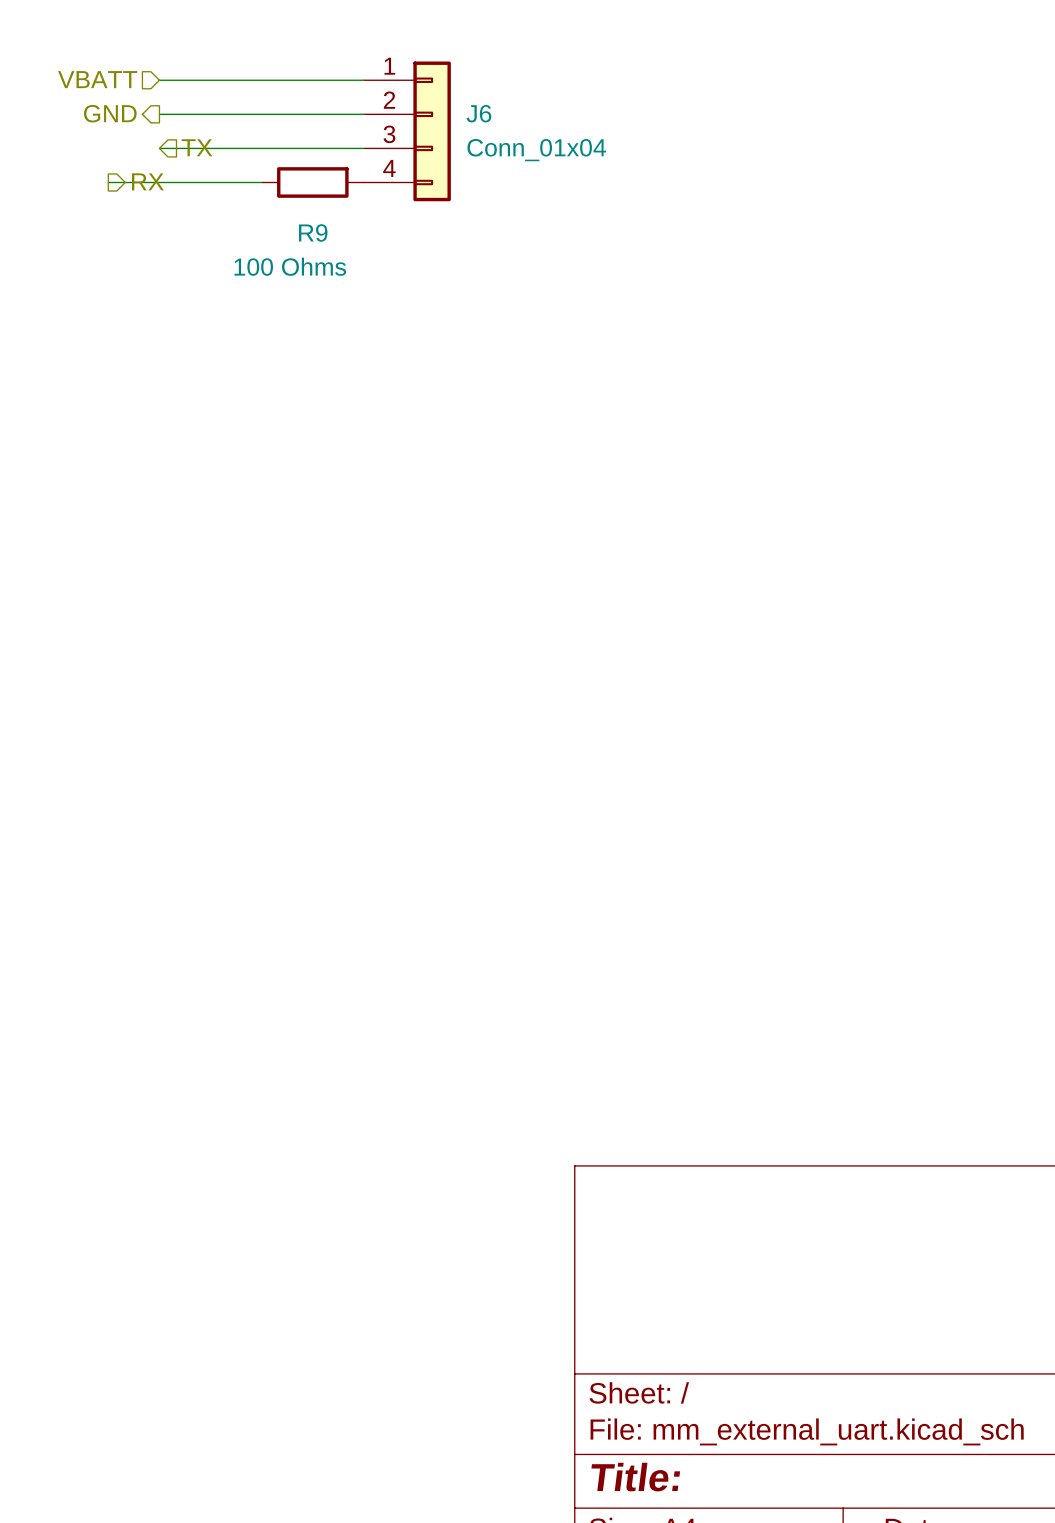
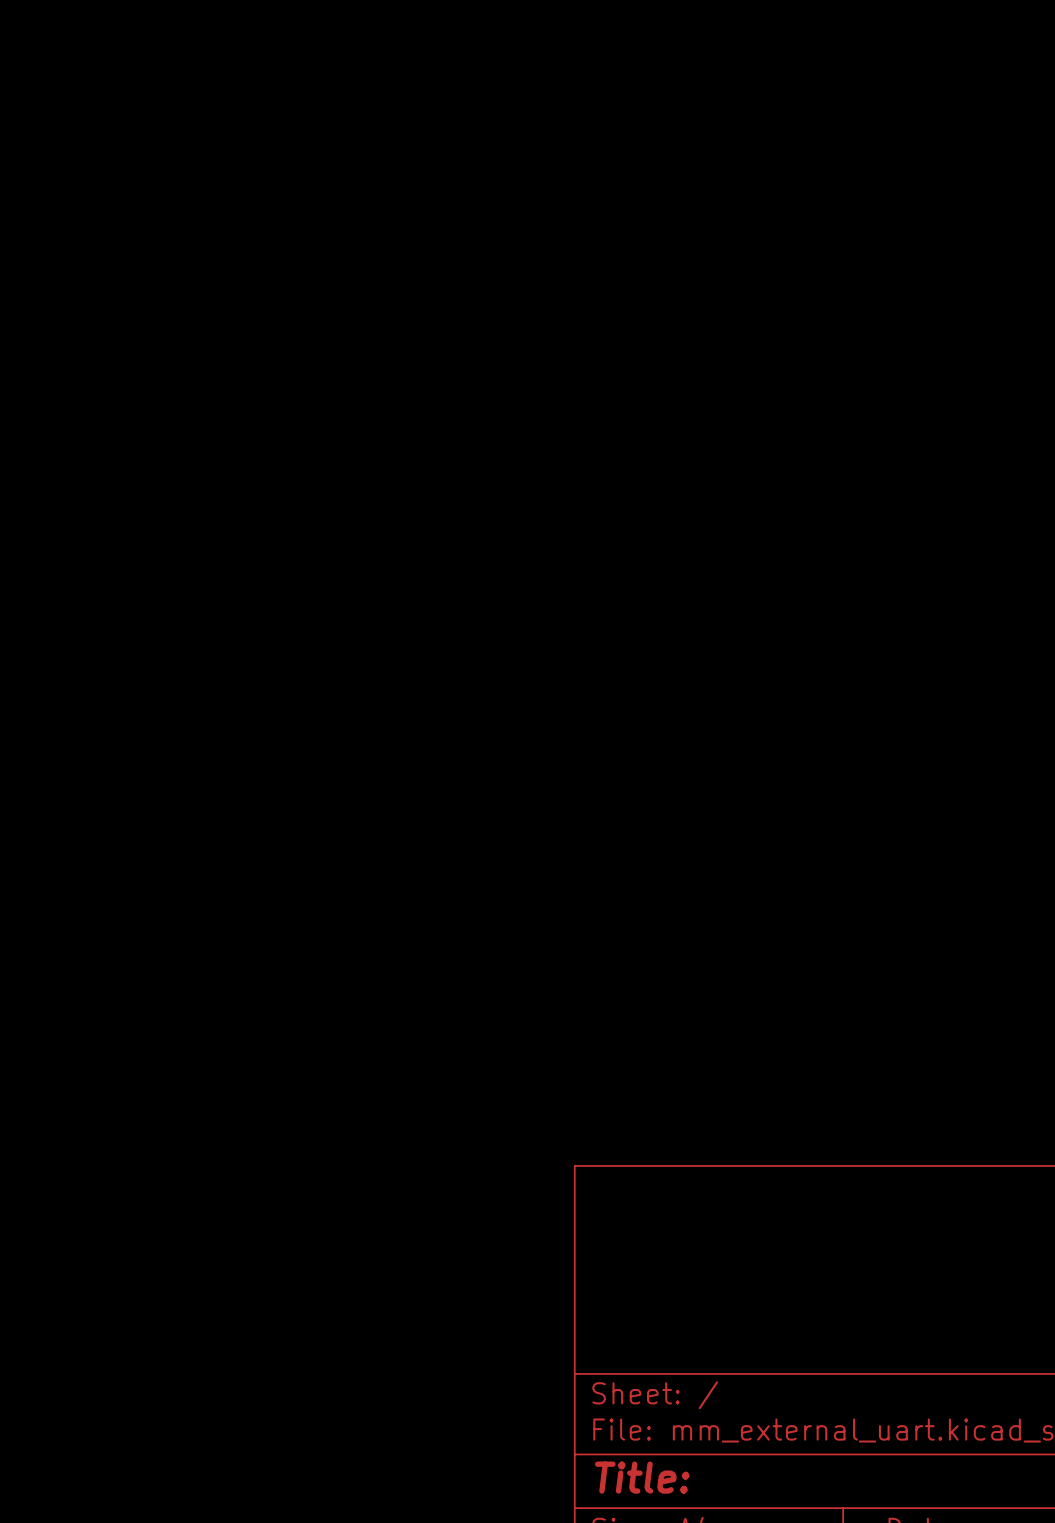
hierarchical label: VBATT (97, 79) -> none
wire: (159, 80) (363, 80) -> none
hierarchical label: GND (110, 113) -> none
wire: (159, 114) (363, 114) -> none
J6: Conn_01x04 (407, 131) -> none
hierarchical label: TX (196, 147) -> none
wire: (159, 148) (363, 148) -> none
hierarchical label: RX (147, 181) -> none
wire: (108, 182) (261, 182) -> none
R9: 100 Ohms (312, 182) -> none

